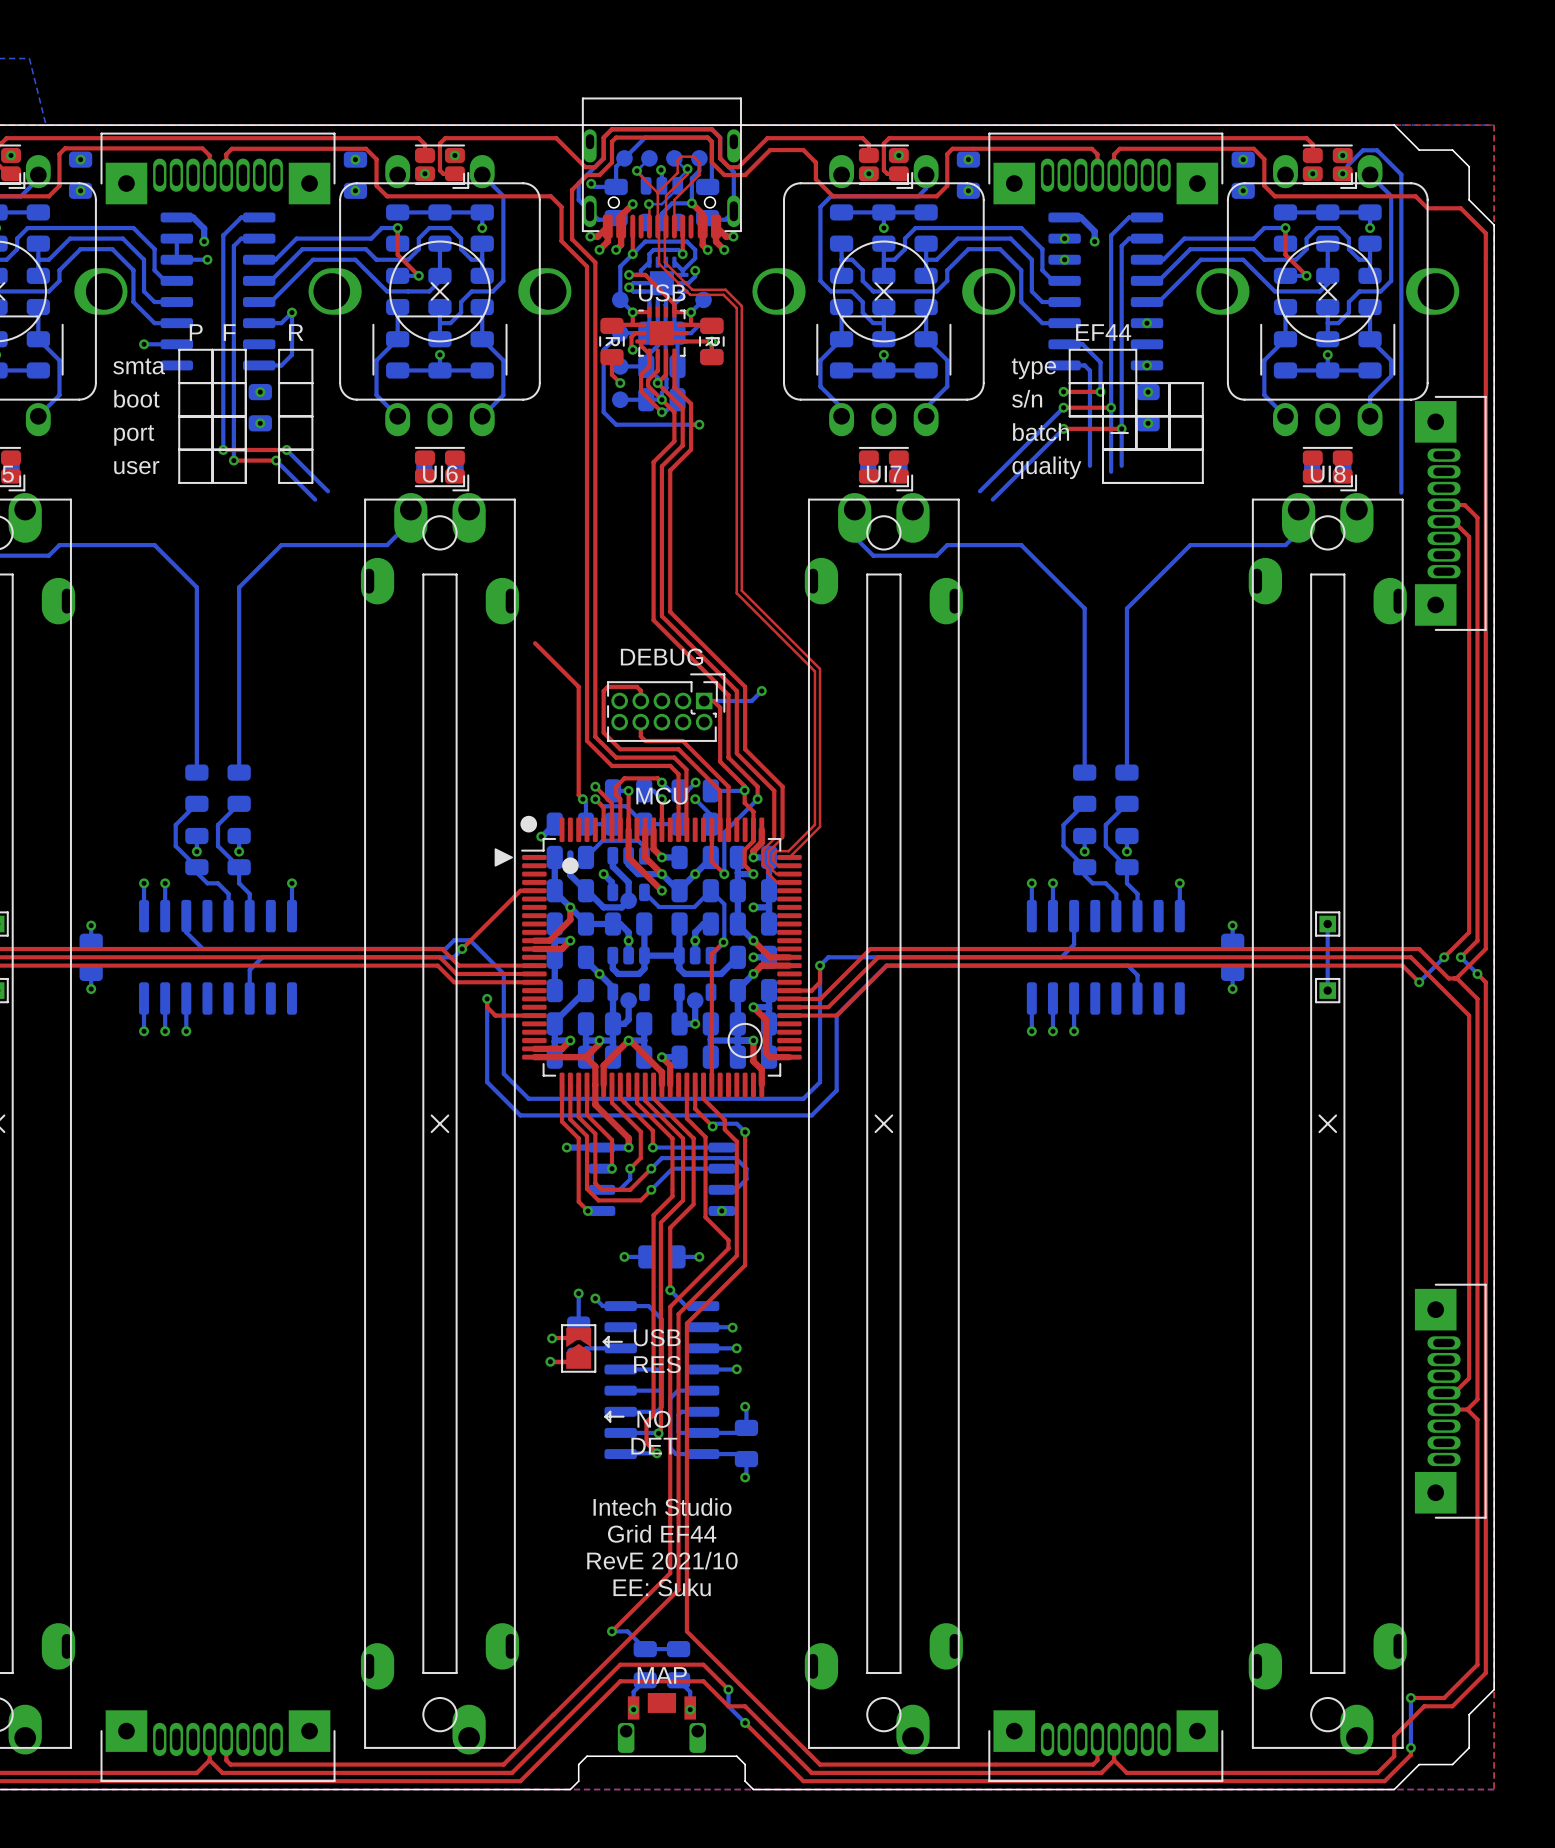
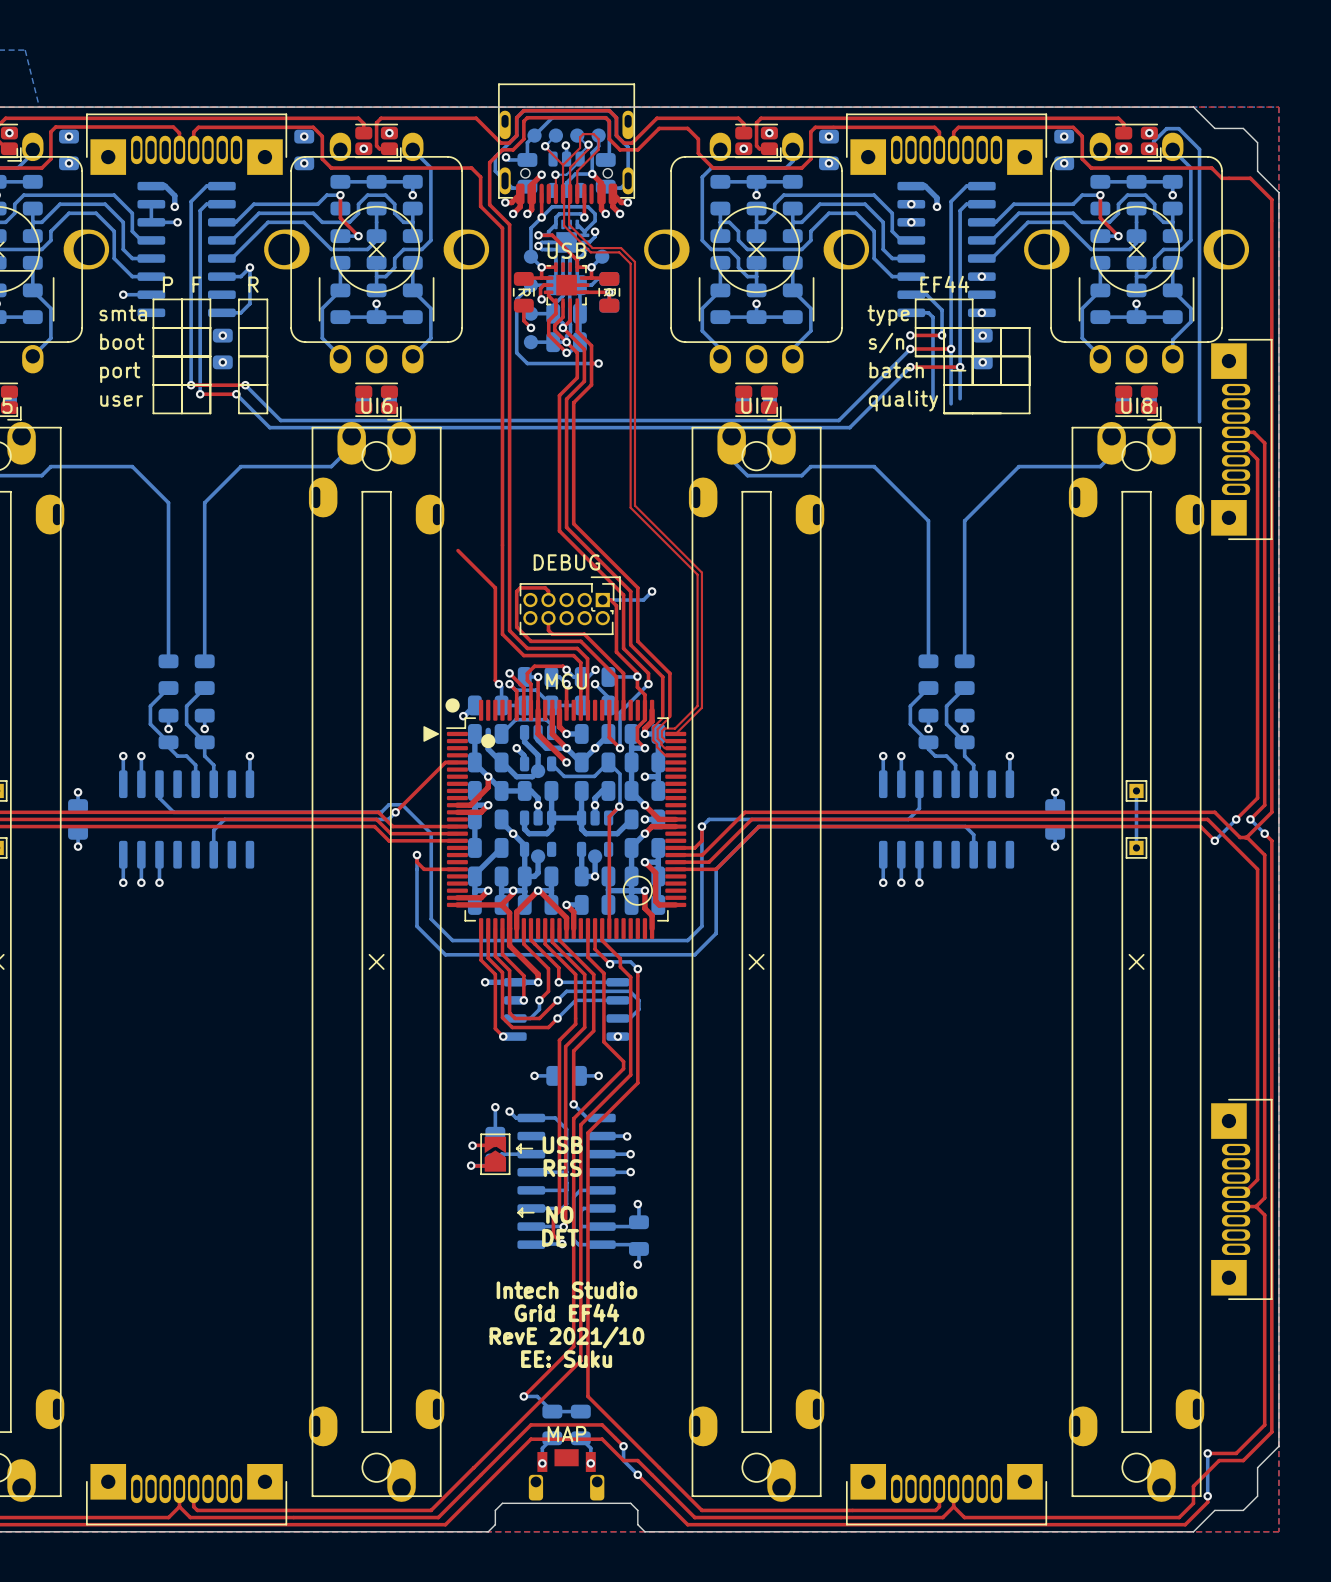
bottom track: none -> (280, 420) (838, 420)
bottom track: none -> (269, 427) (849, 427)

